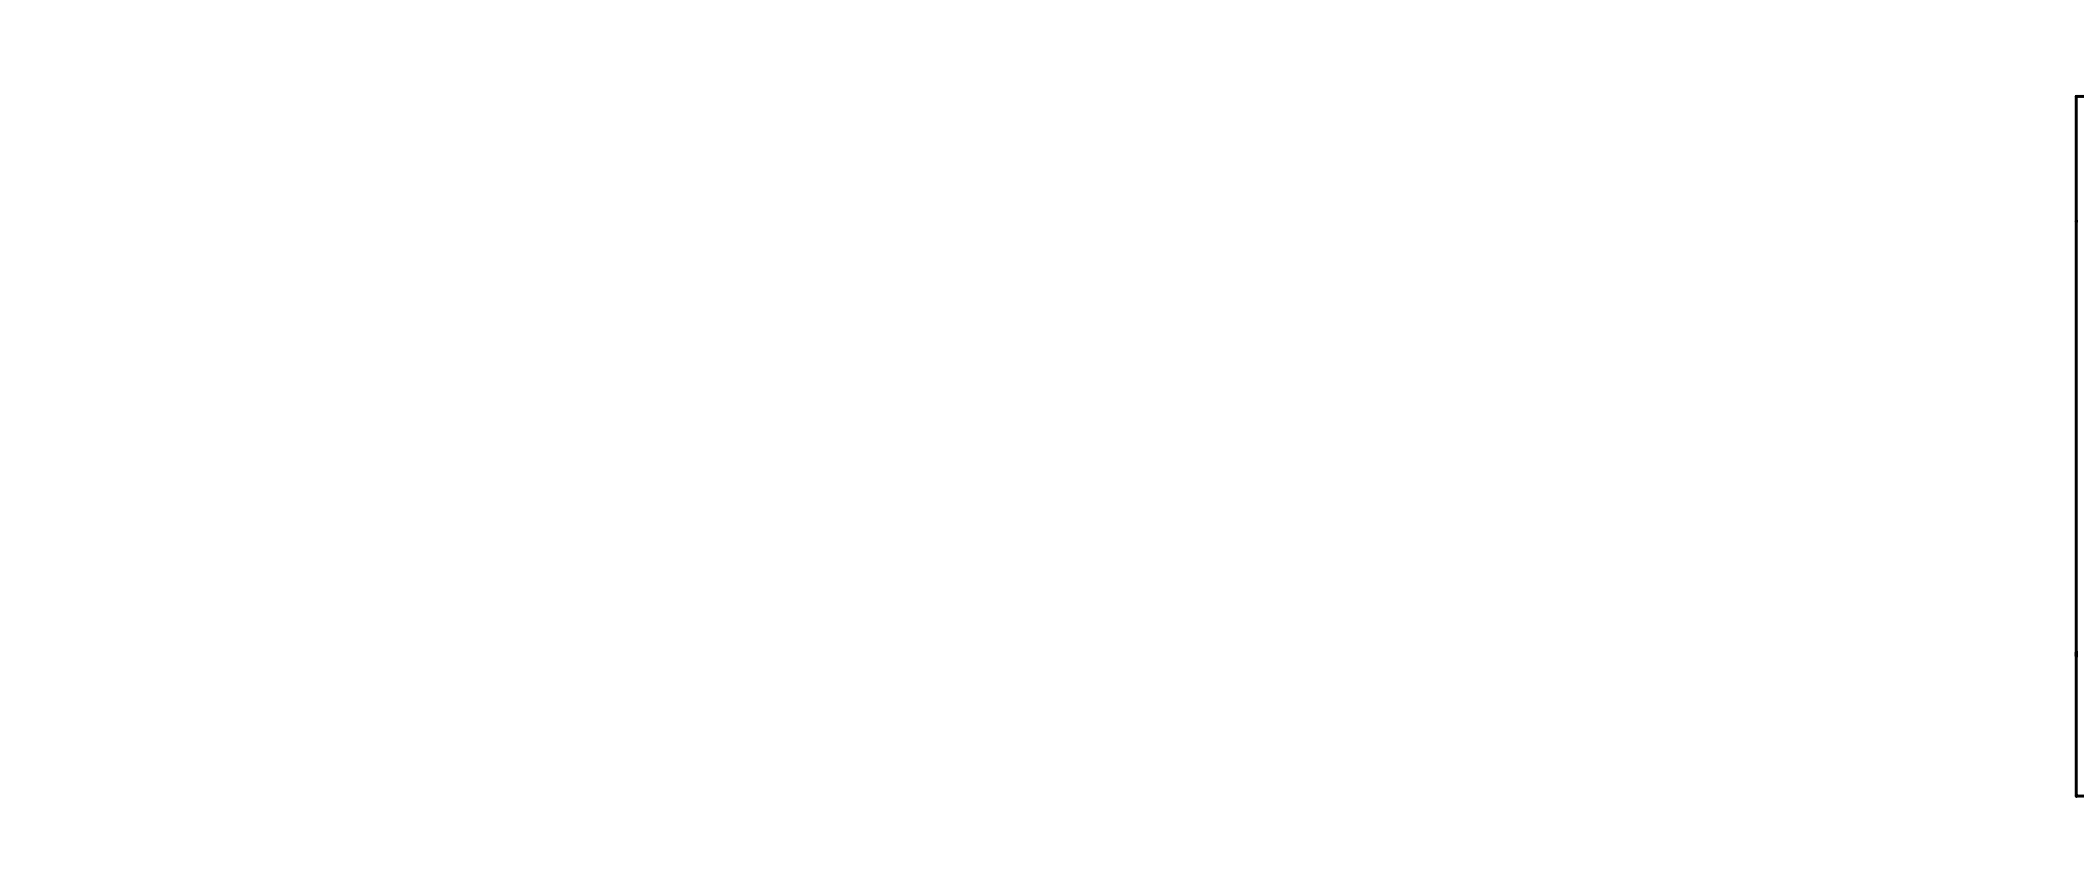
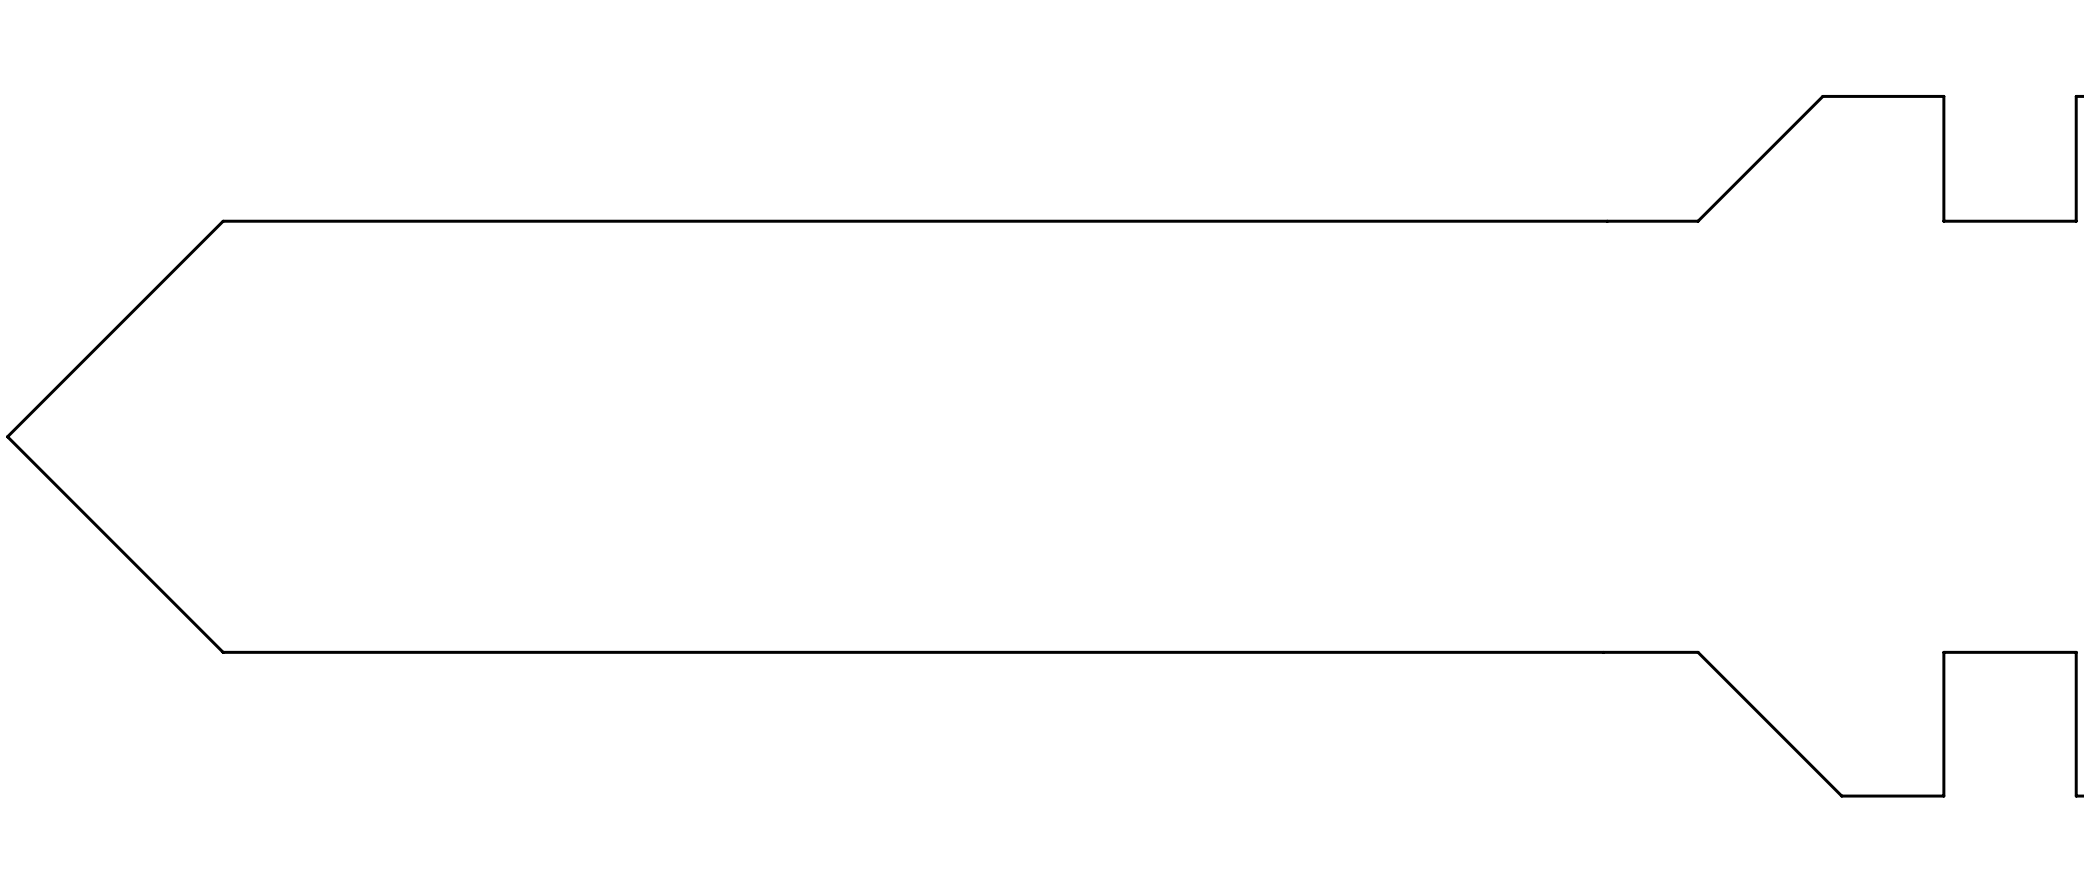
board edge: (2076, 221) (2076, 652) -> (2076, 221) (1943, 221) (1943, 96) (1822, 96) (1698, 221) (223, 221) (7, 436) (223, 652) (1698, 652) (1841, 796) (1943, 796) (1943, 652) (2076, 652)

